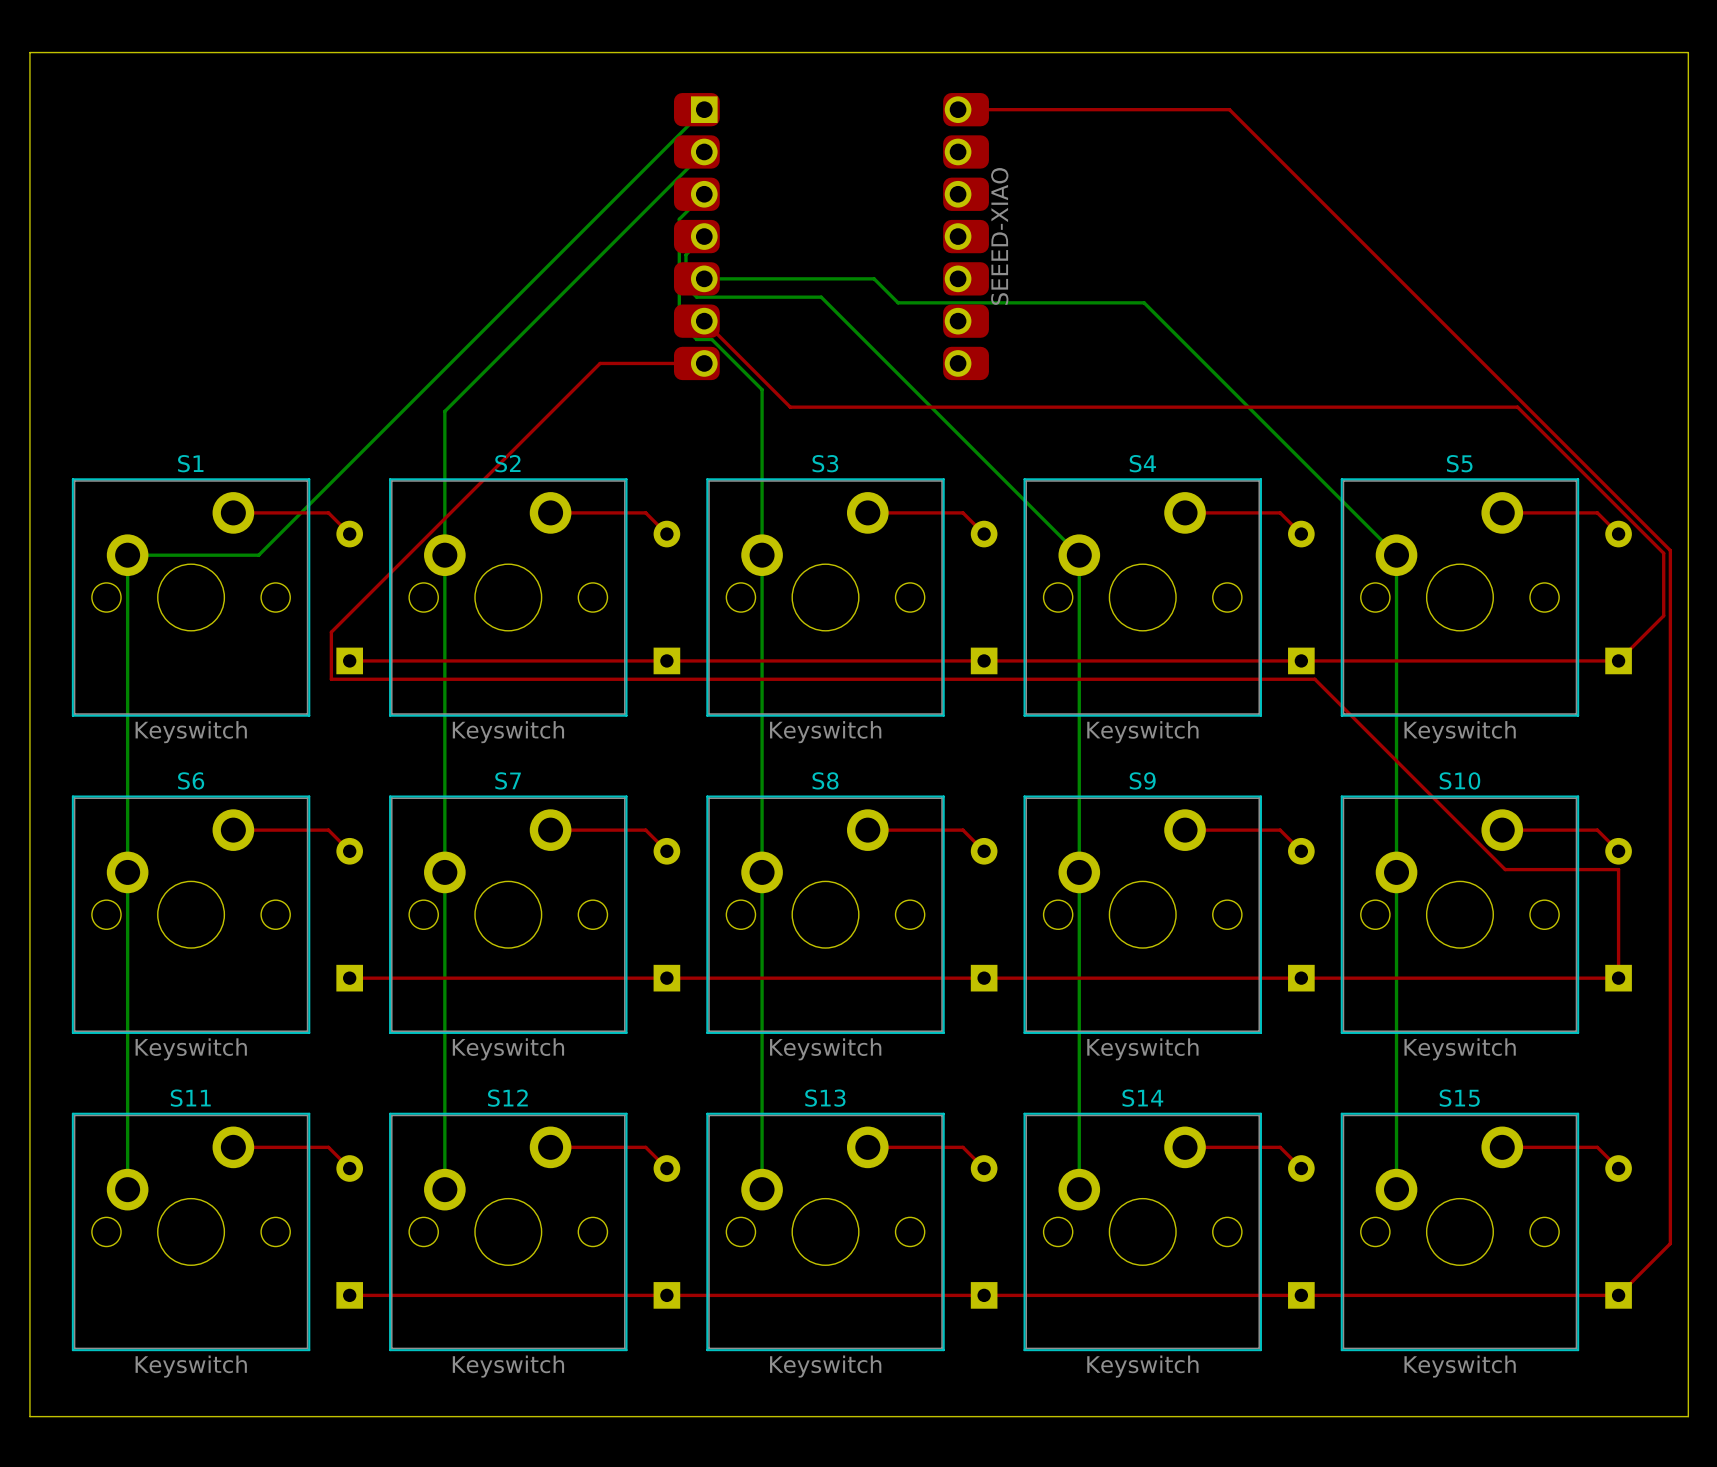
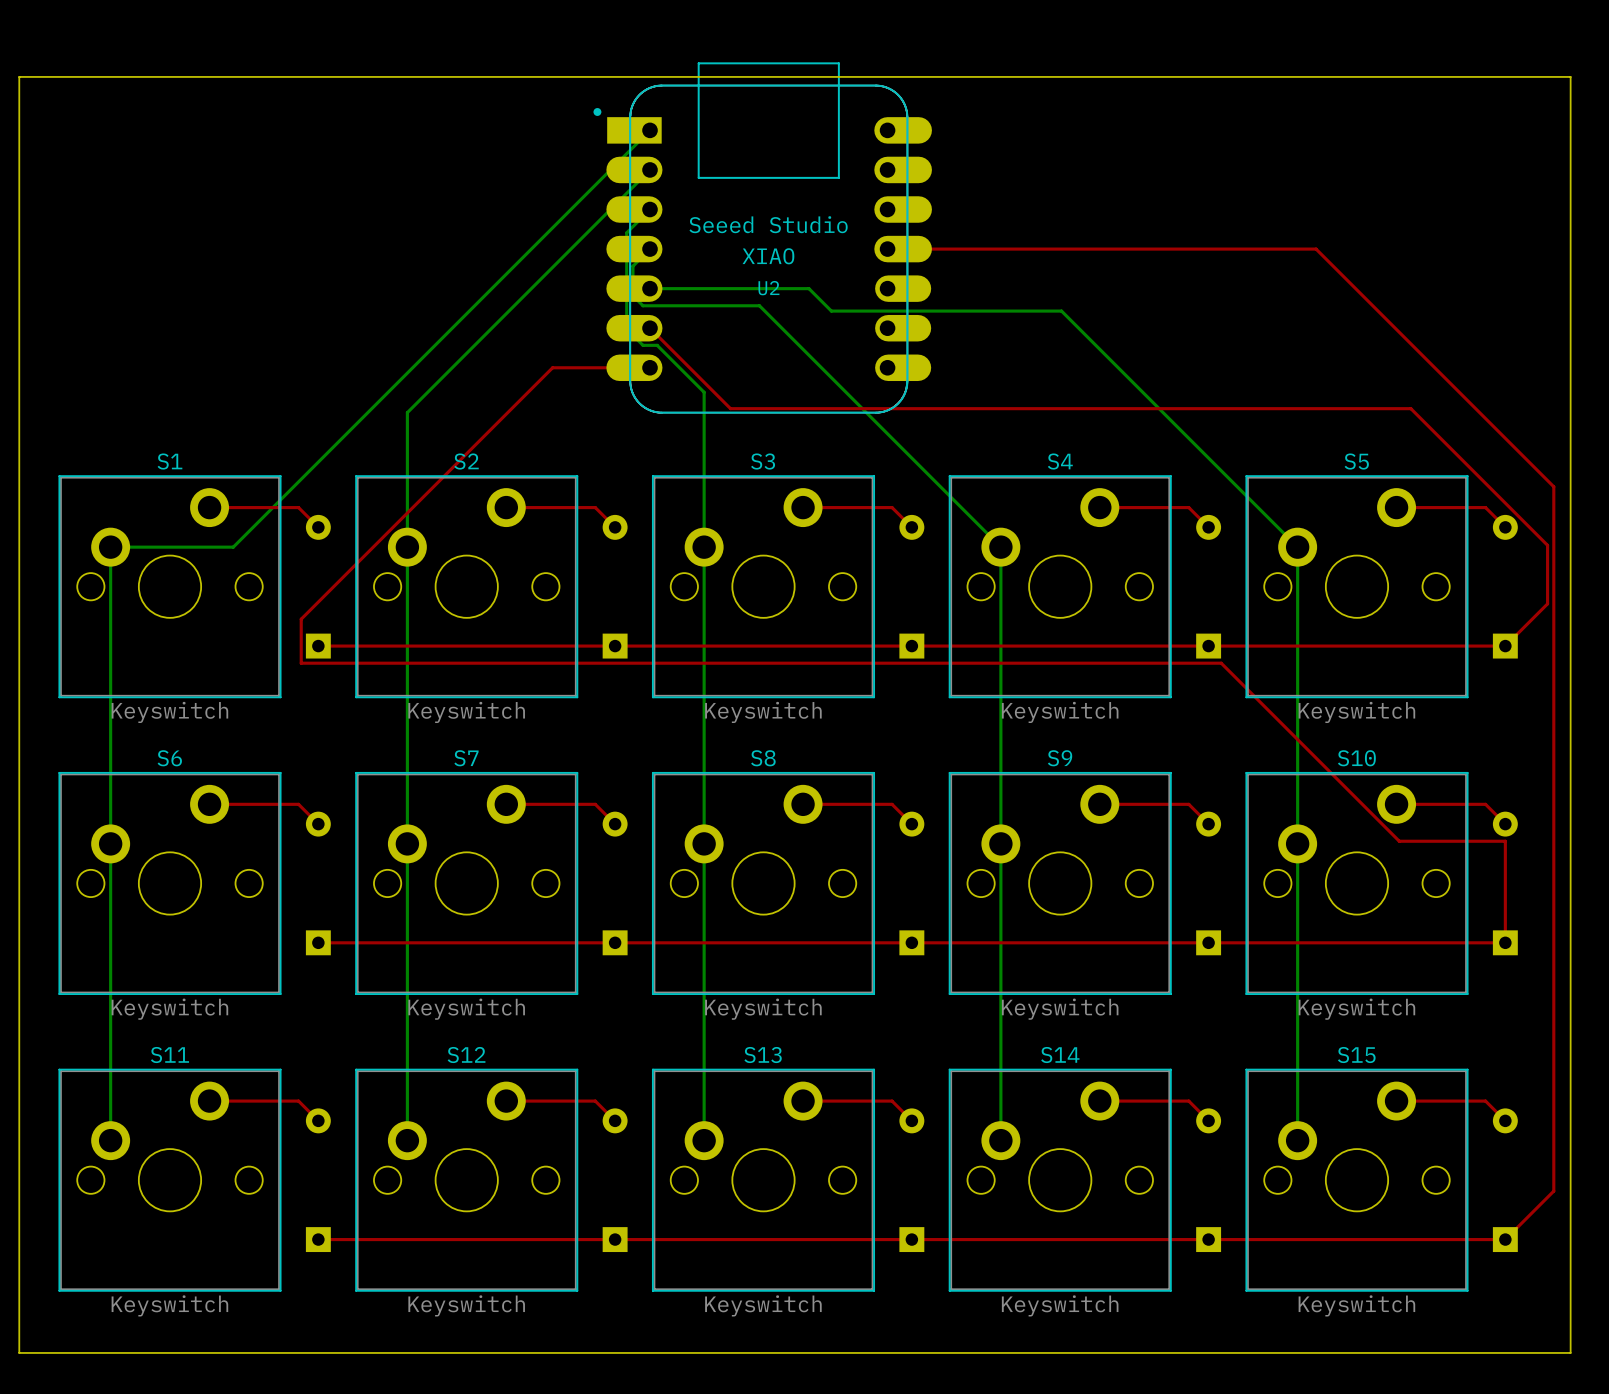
top track: (958, 109) (1229, 109) (1670, 550) -> (887, 249) (1316, 249) (1553, 486) (1553, 542)
U2: none -> (762, 237)
part: SEEED-XIAO (831, 236) -> none

